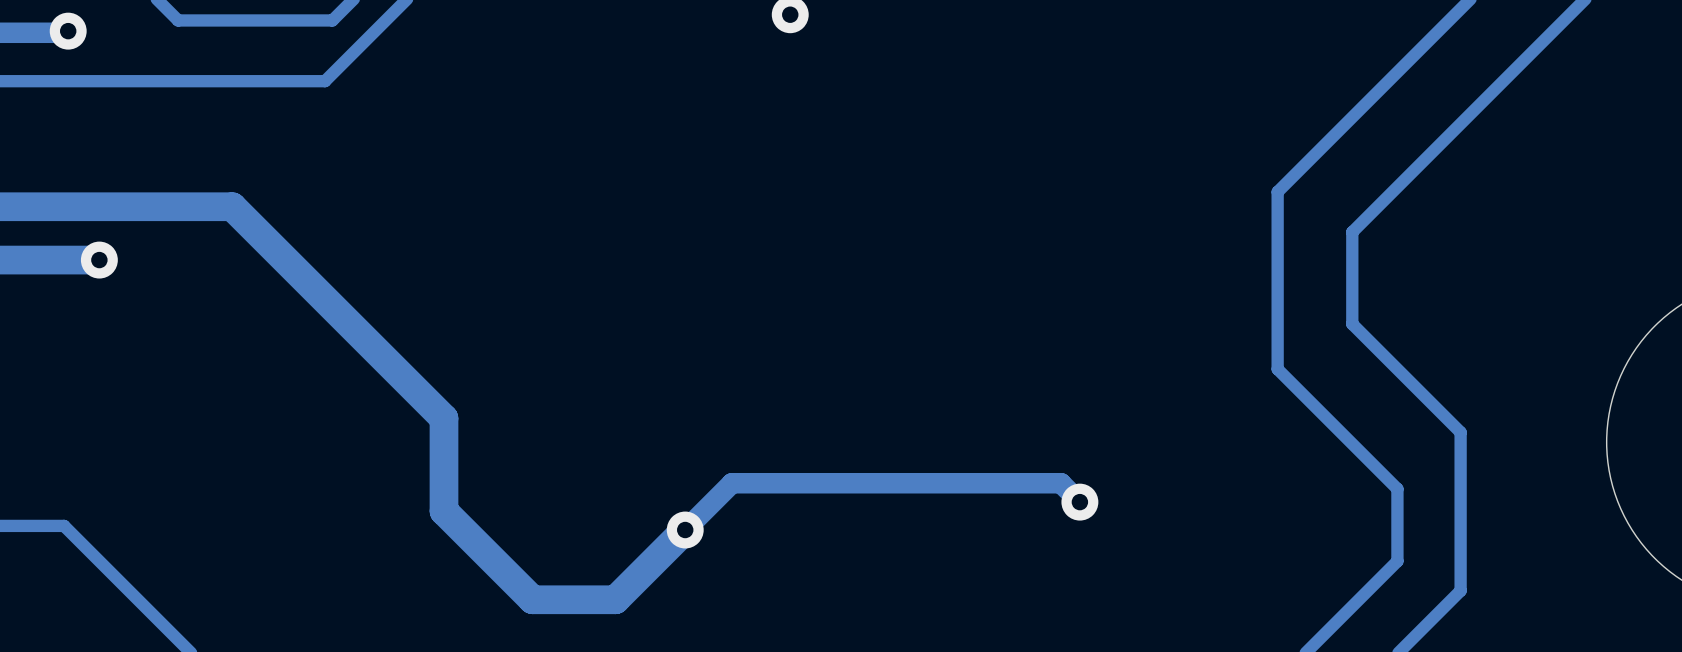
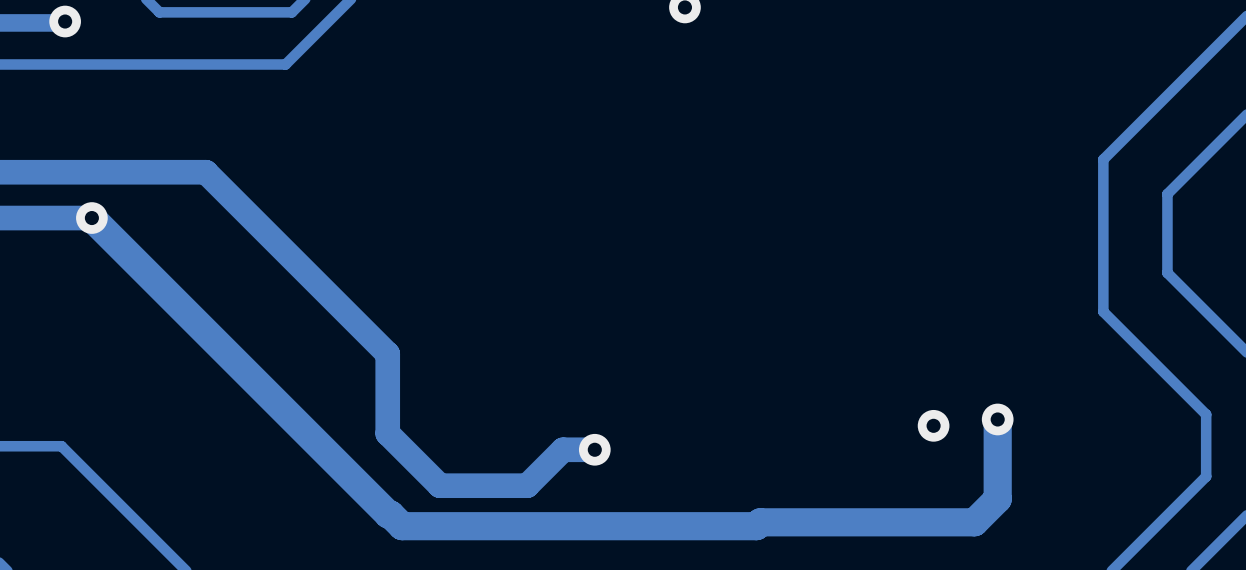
track: none -> (91, 218) (402, 526) (756, 526) (760, 522) (974, 522) (997, 499) (997, 419)
via: none -> (997, 419)
track: (1079, 502) (1061, 483) (731, 483) (615, 599) (532, 599) (504, 571) -> (594, 449) (563, 449) (527, 485) (439, 485)

